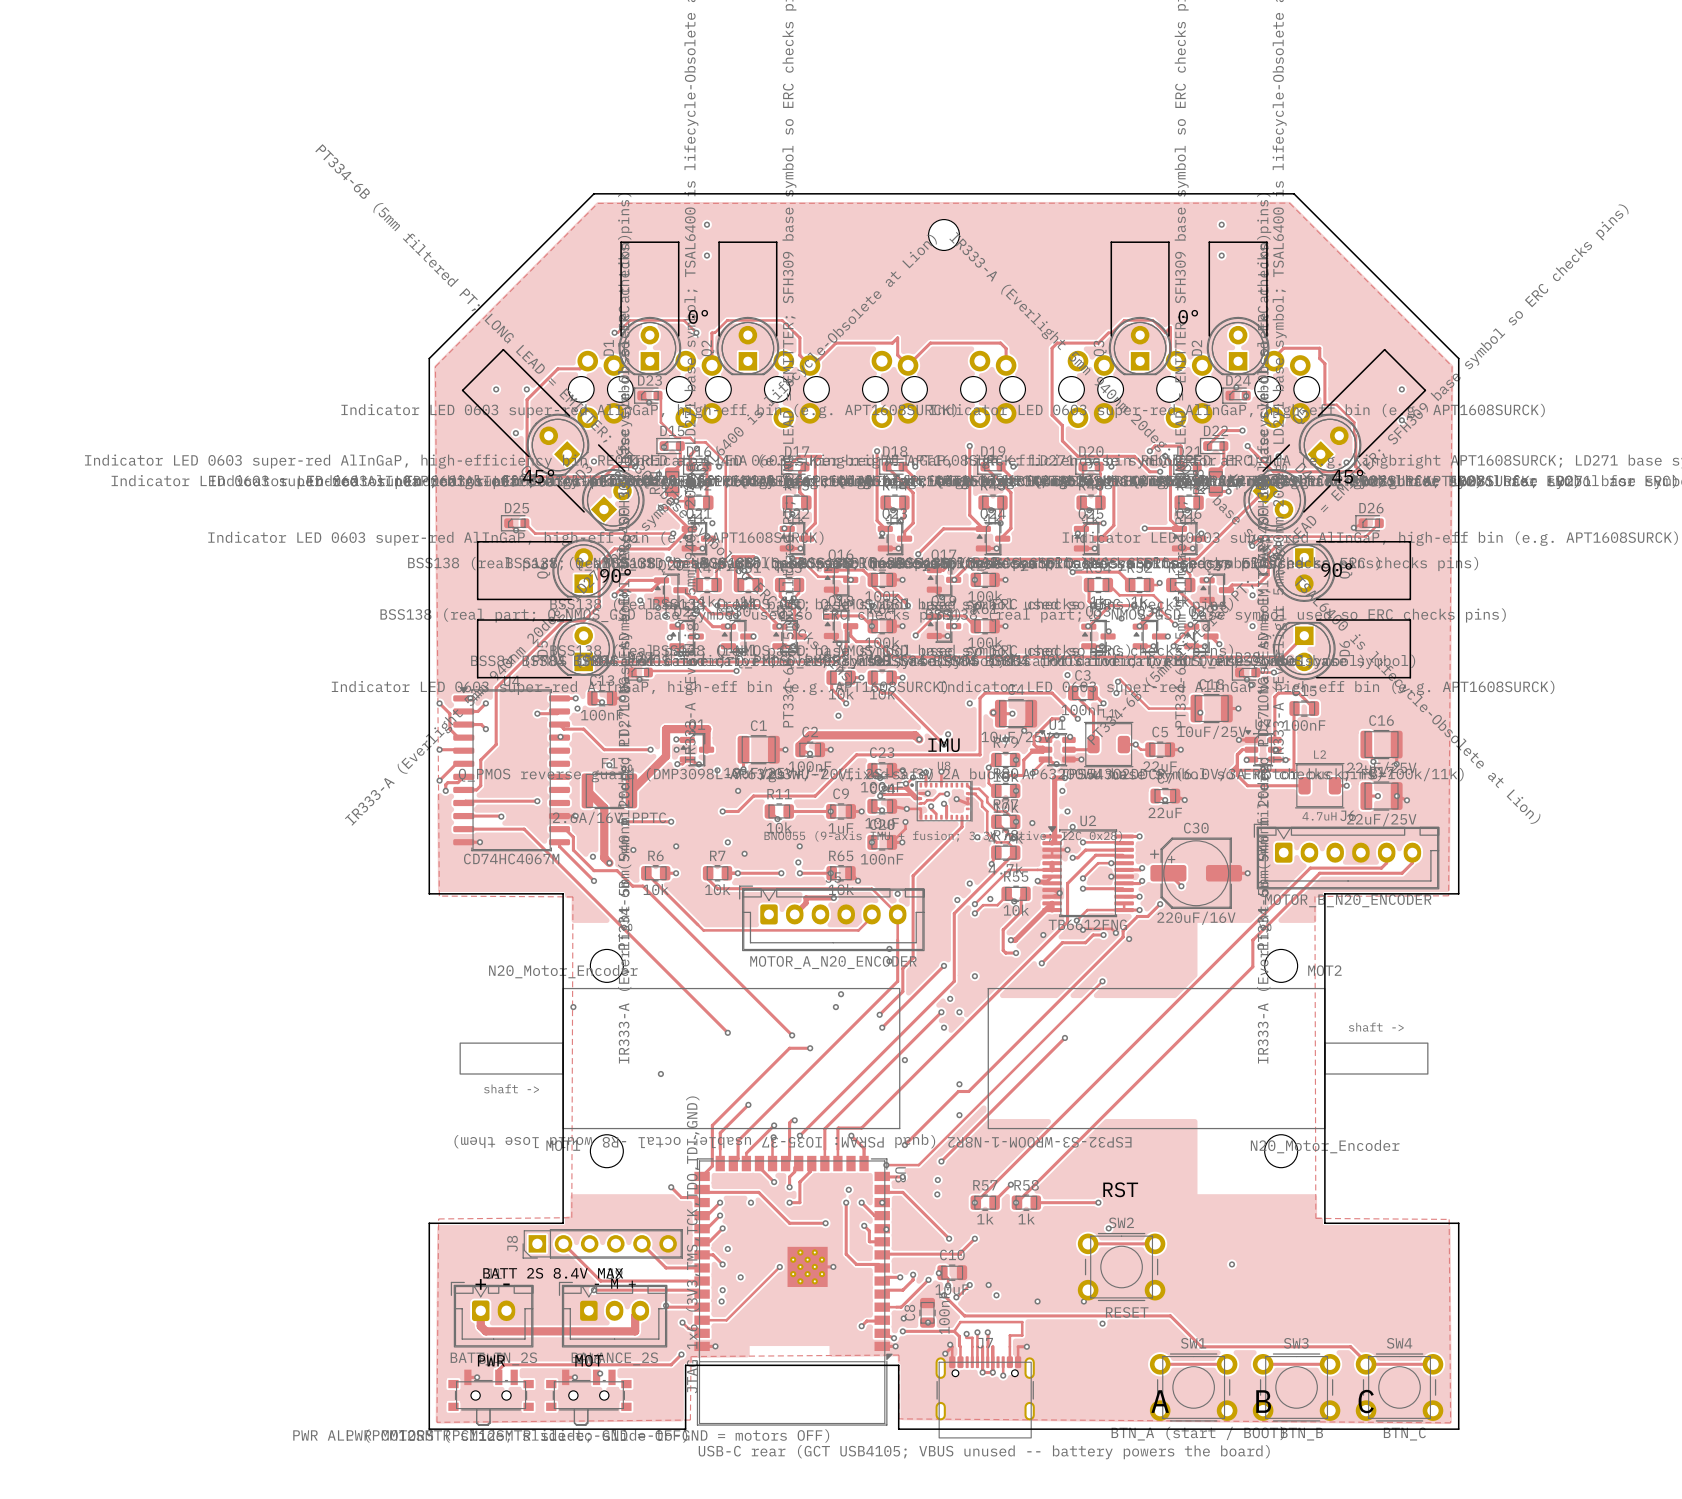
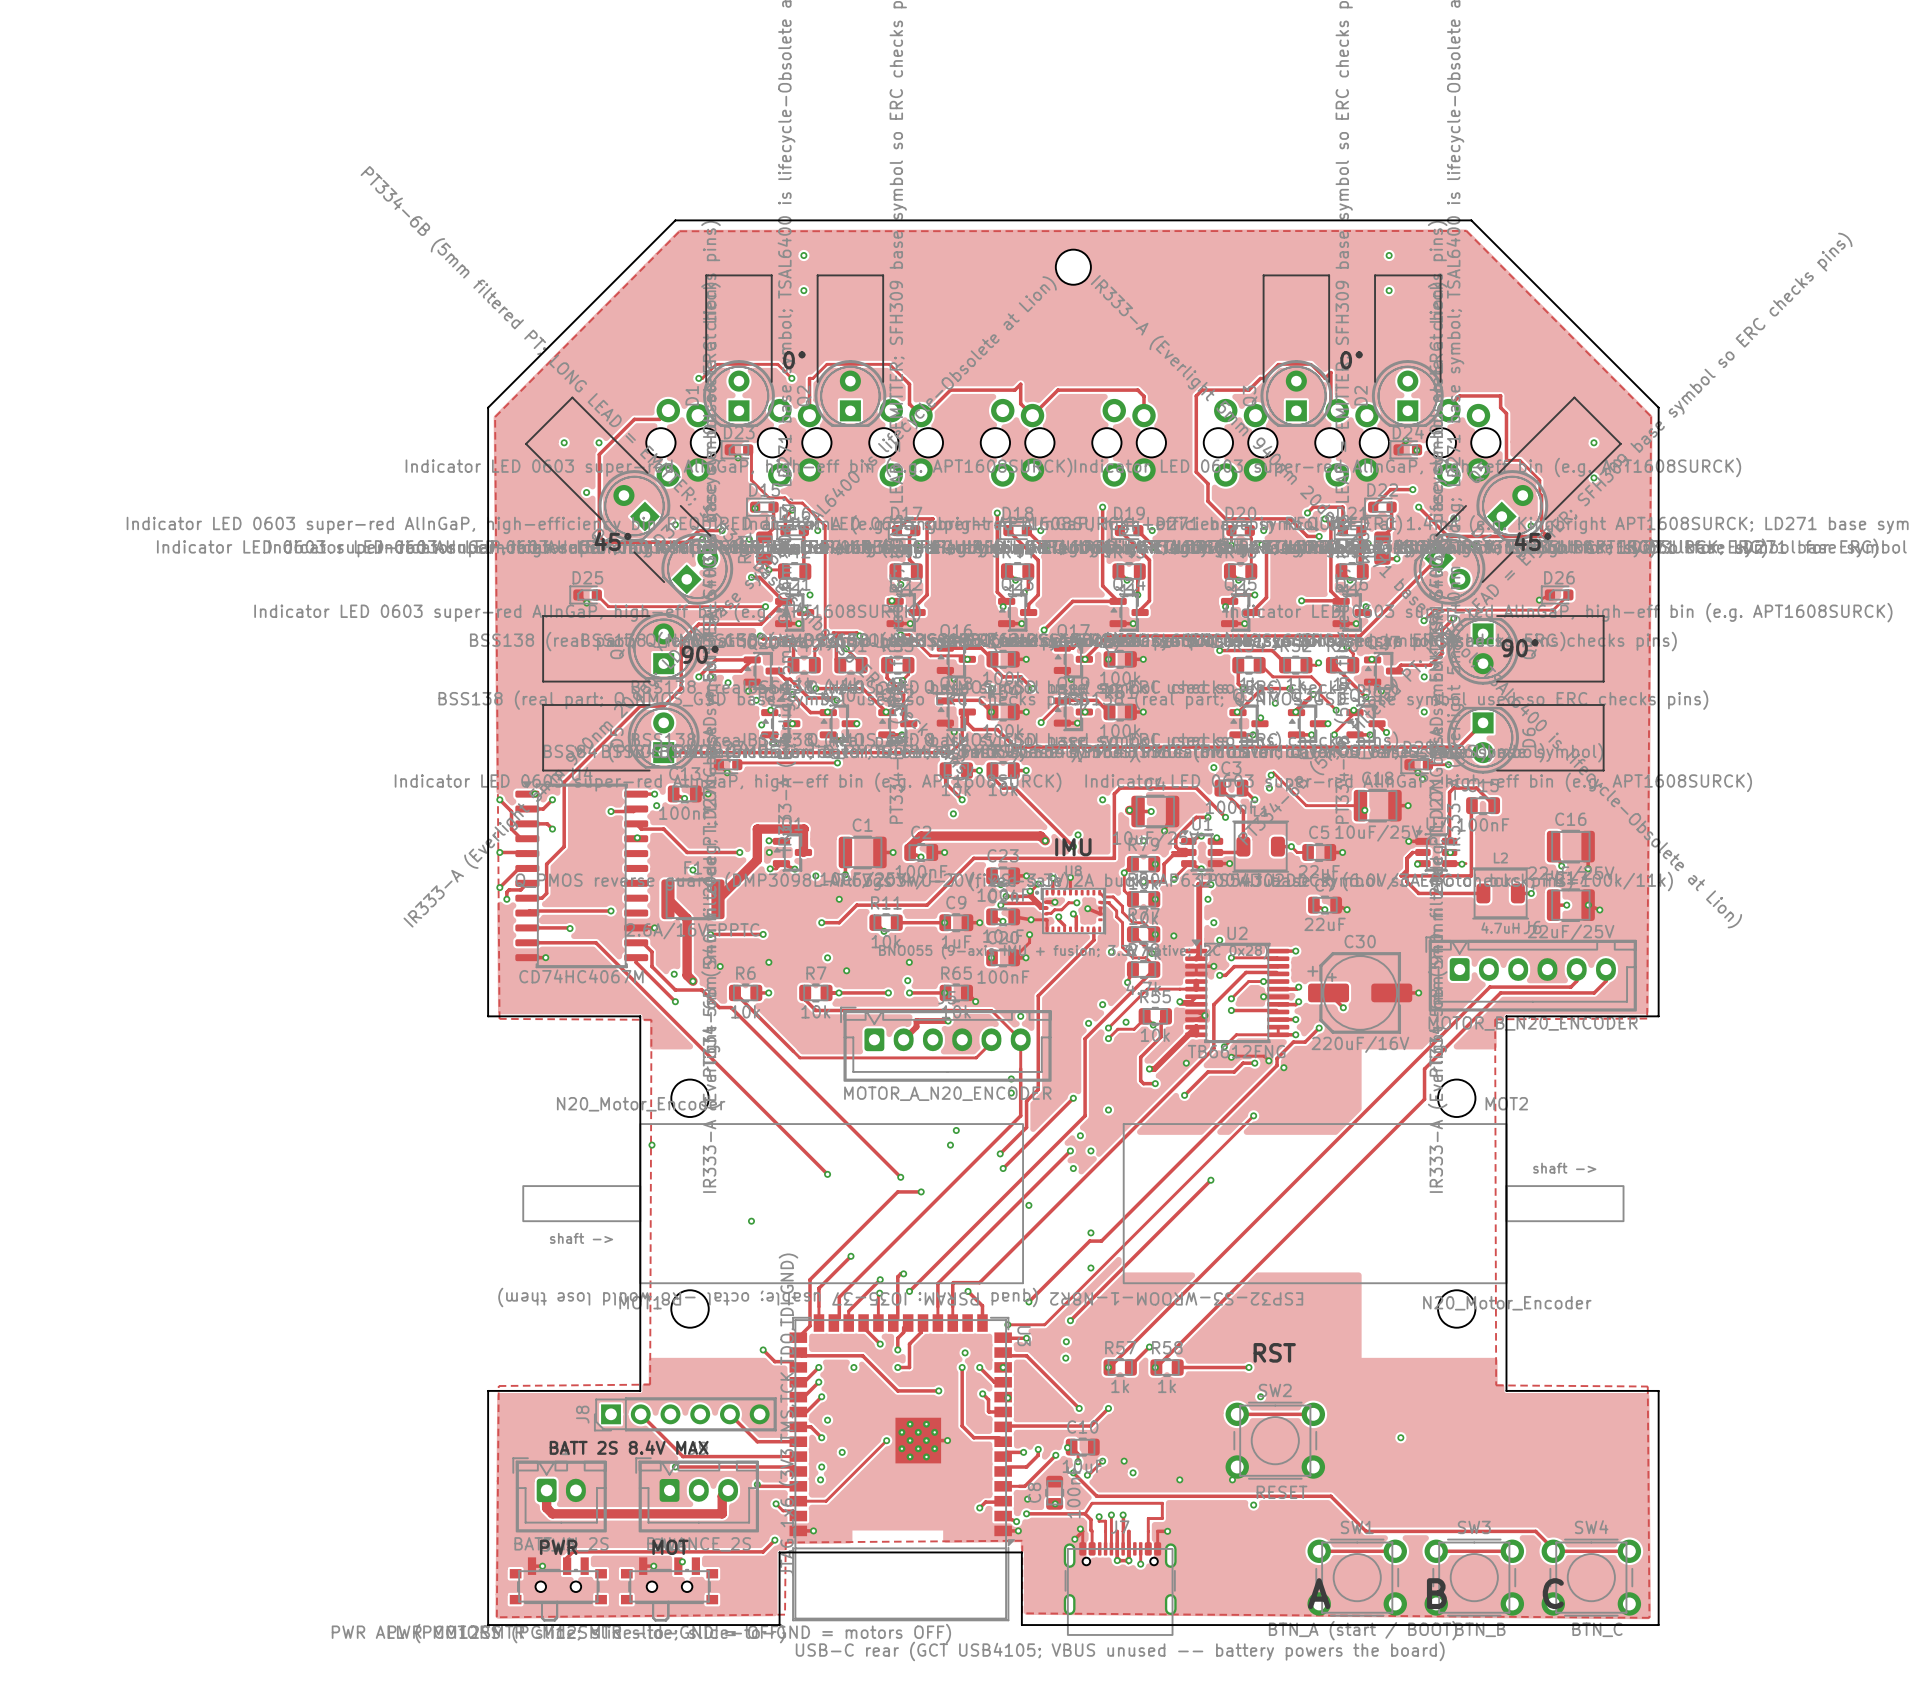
text: - M + (615, 1283) -> none
text: + (480, 1284) -> none
text: - (506, 1284) -> none

